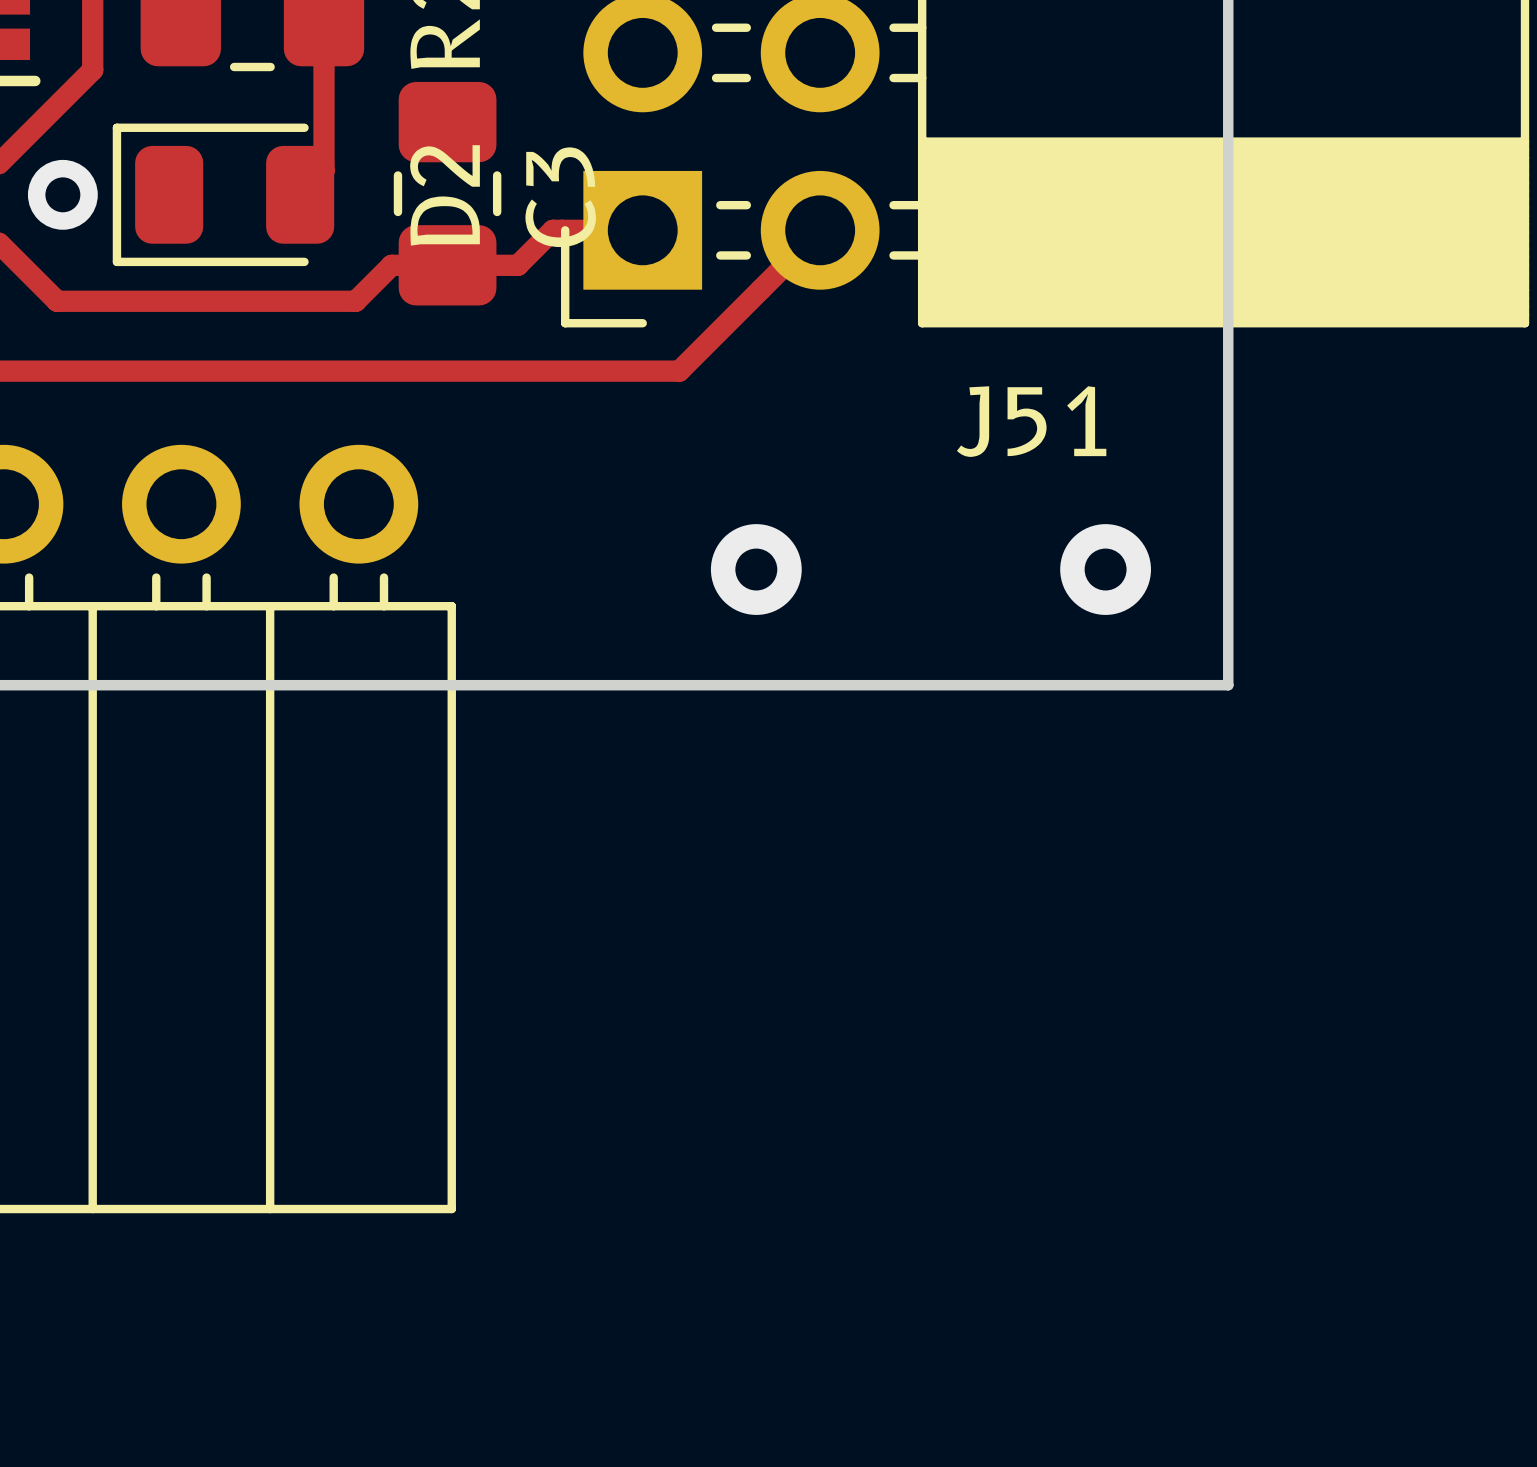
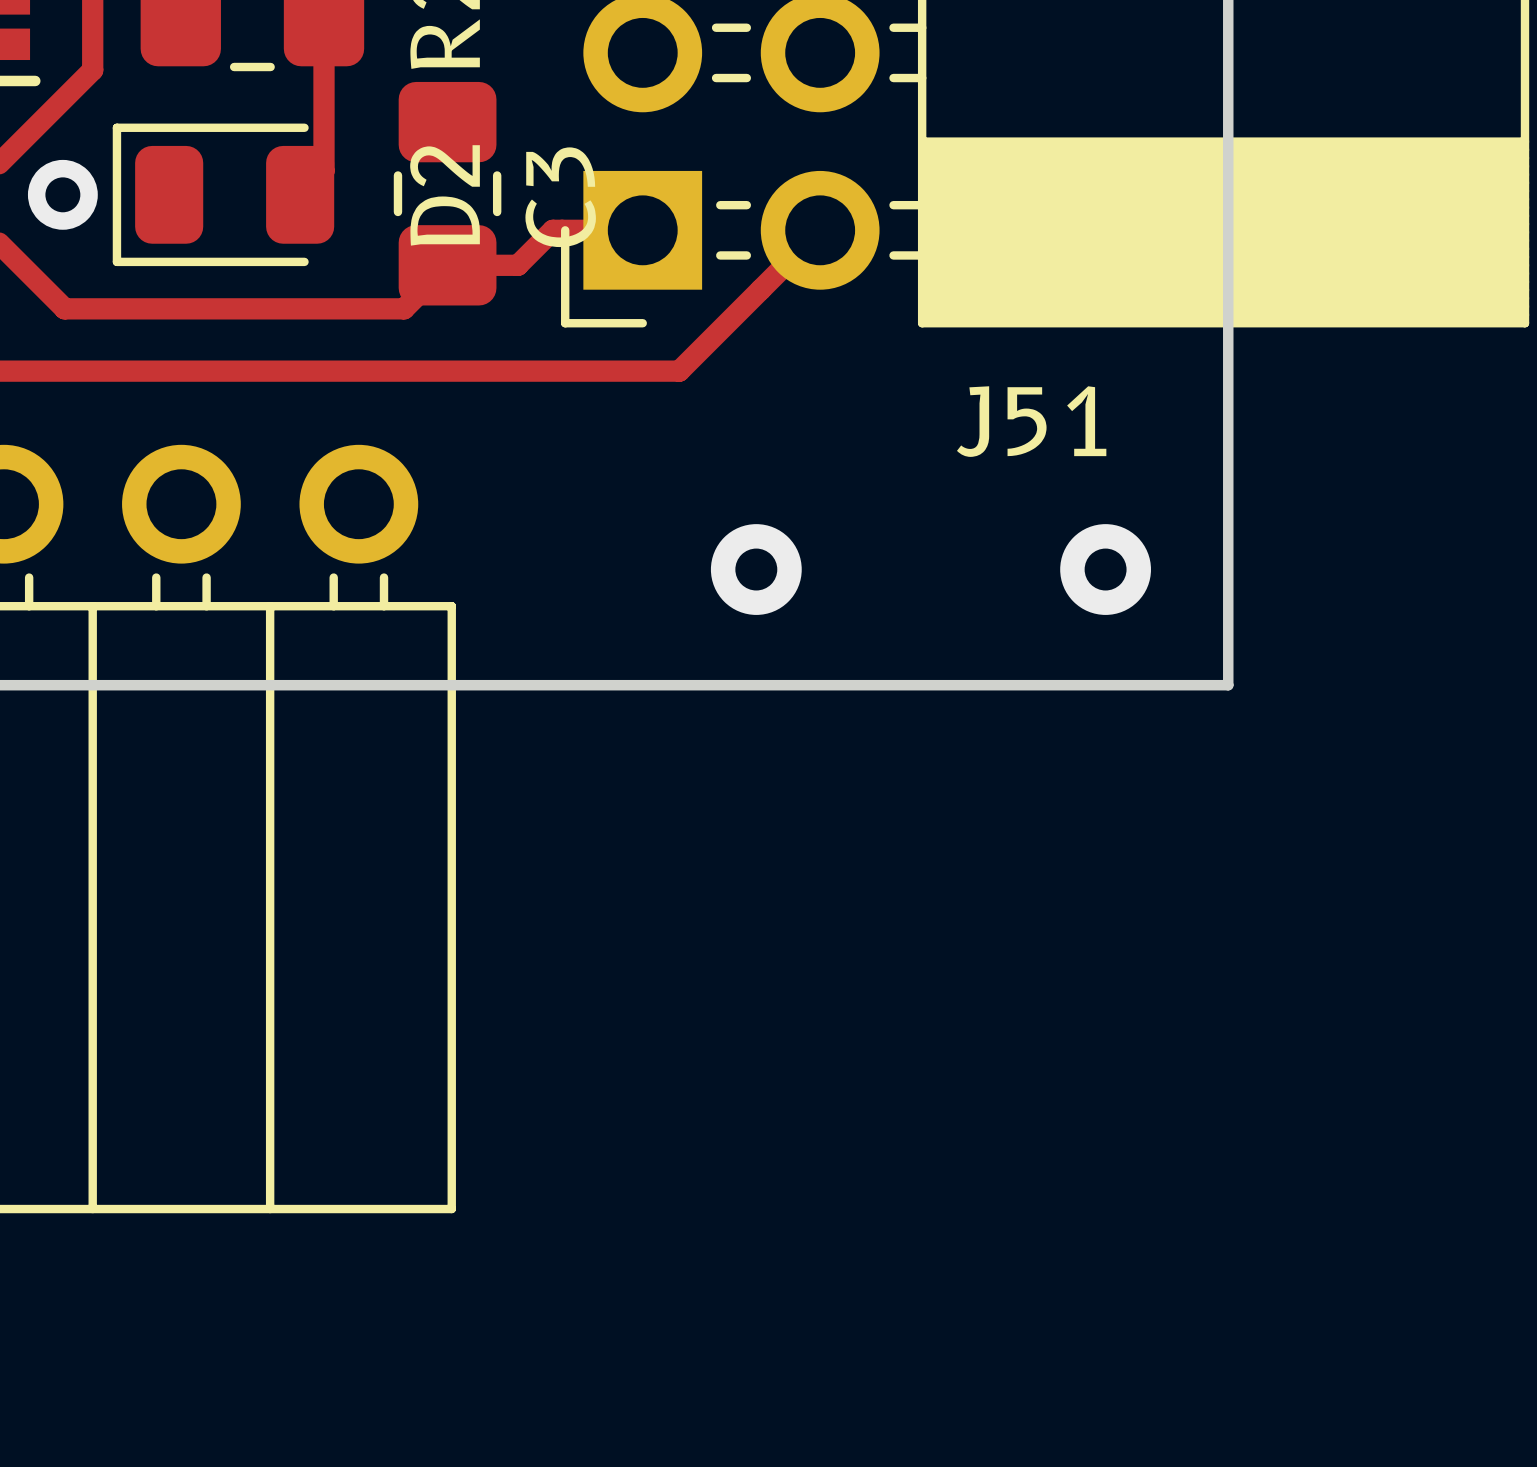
track: (447, 265) (391, 265) (355, 301) (57, 301) -> (447, 265) (404, 308) (64, 308) (57, 301)

